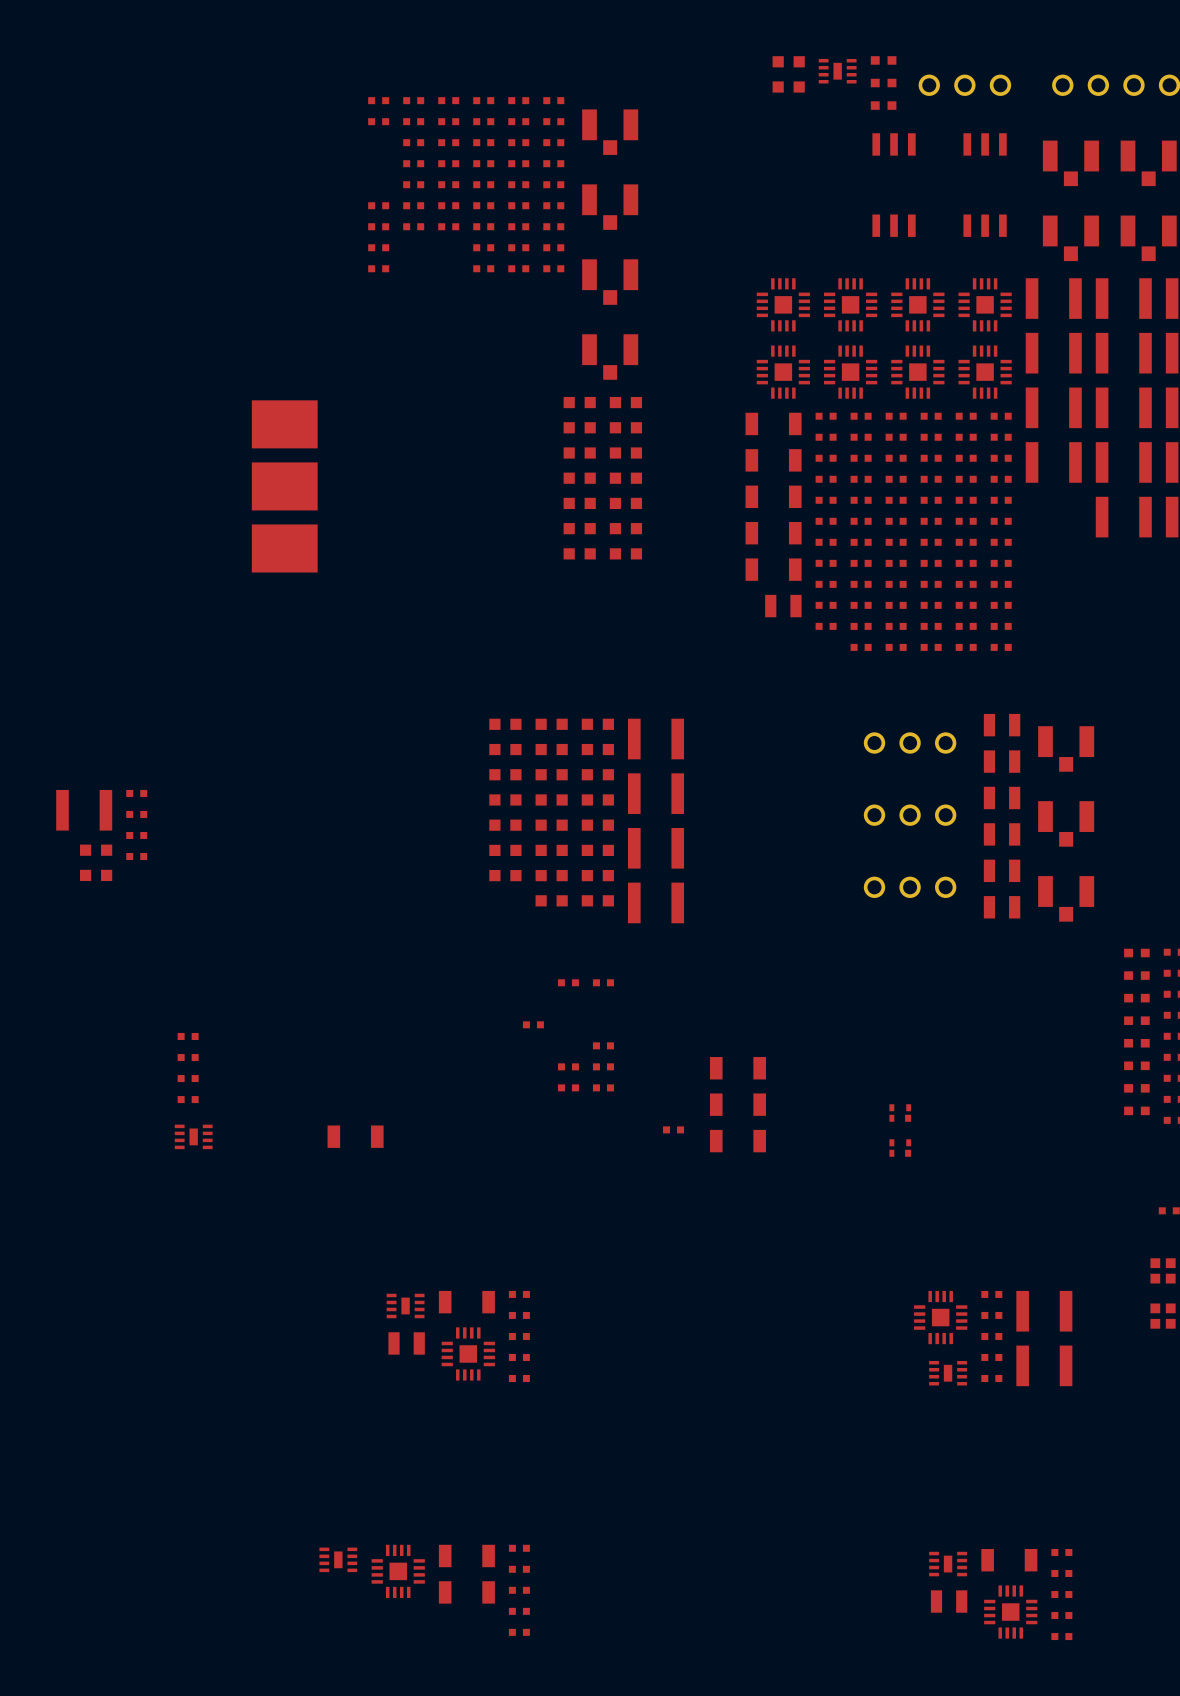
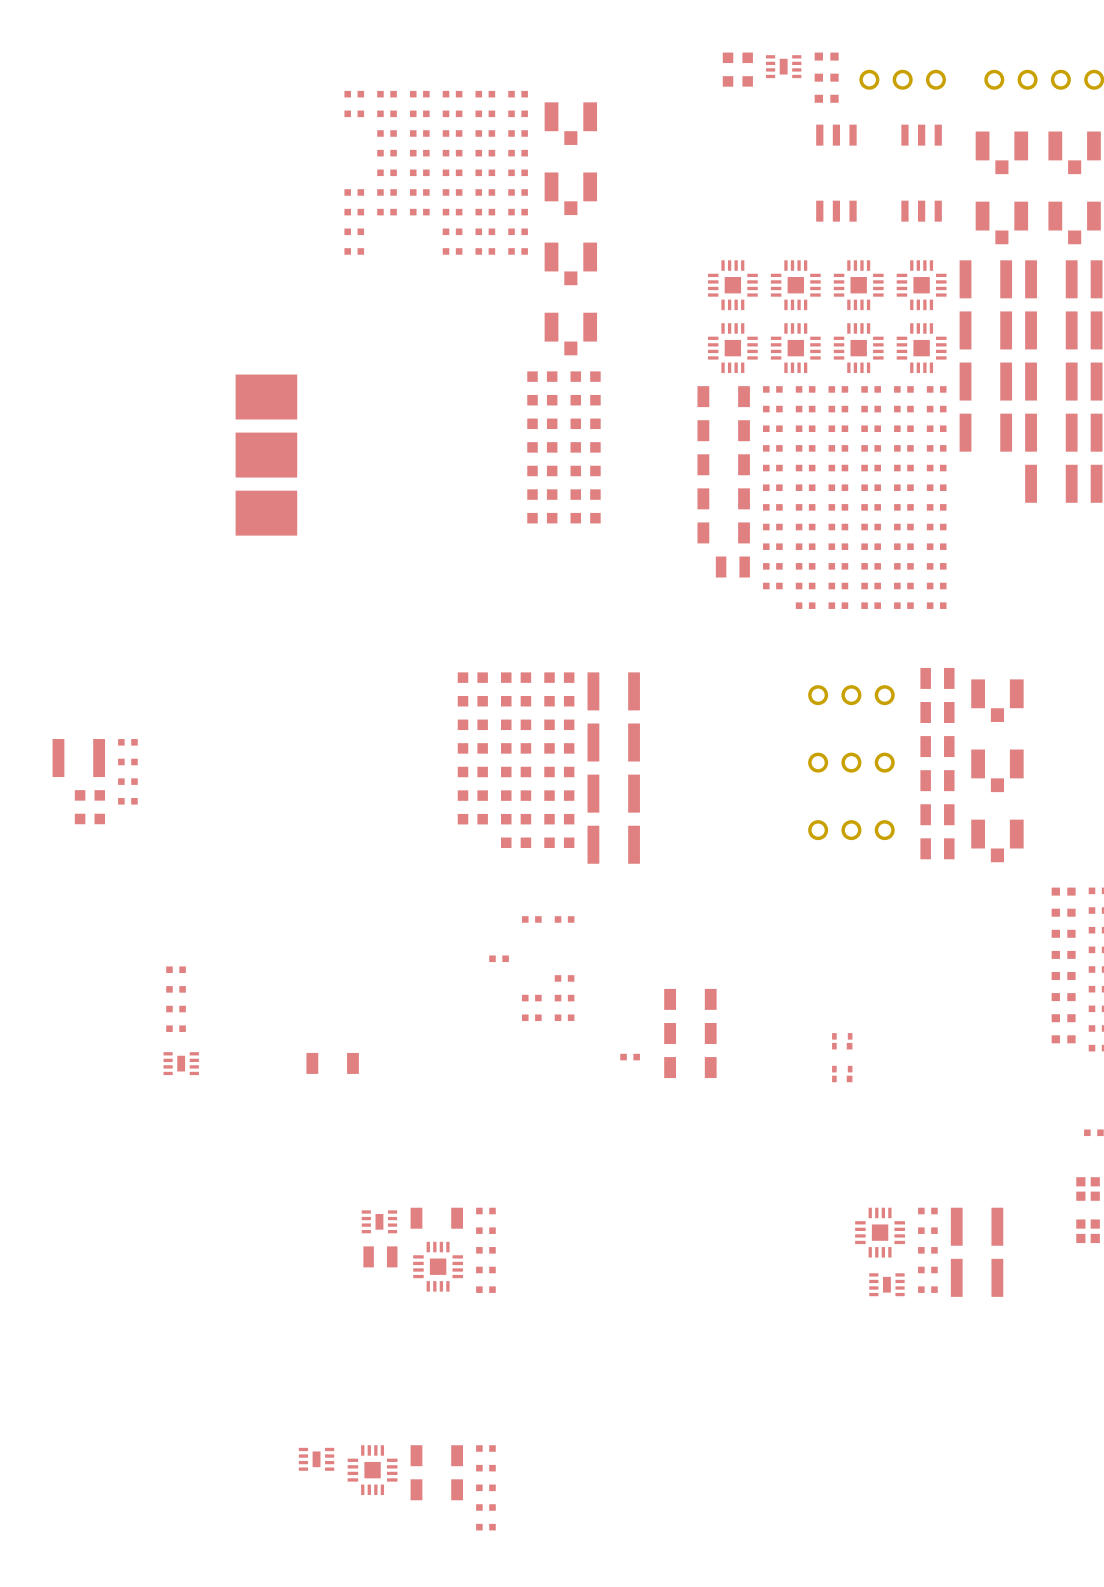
part: (1061, 1552) -> none
part: (1009, 1560) -> none
part: (948, 1564) -> none
part: (1061, 1573) -> none
part: (1061, 1594) -> none
part: (949, 1601) -> none
part: (1010, 1612) -> none
part: (1061, 1615) -> none
part: (1061, 1636) -> none

